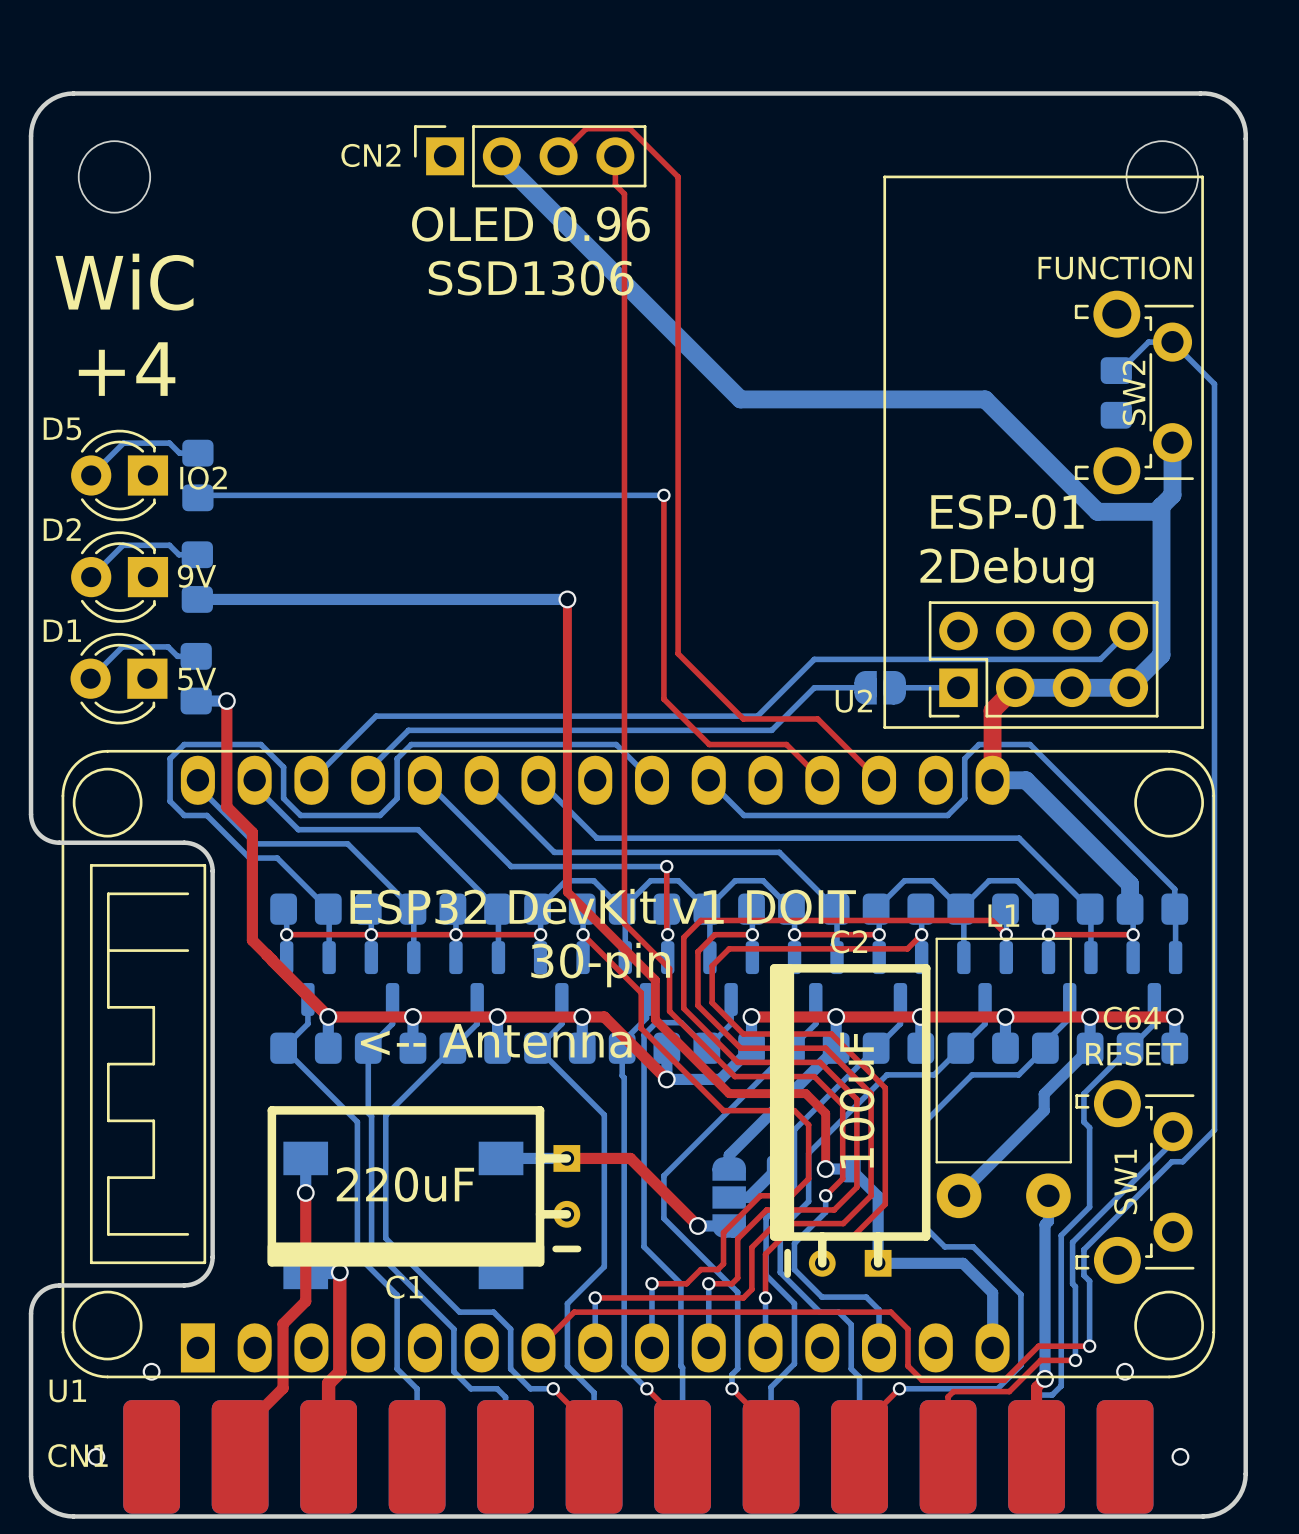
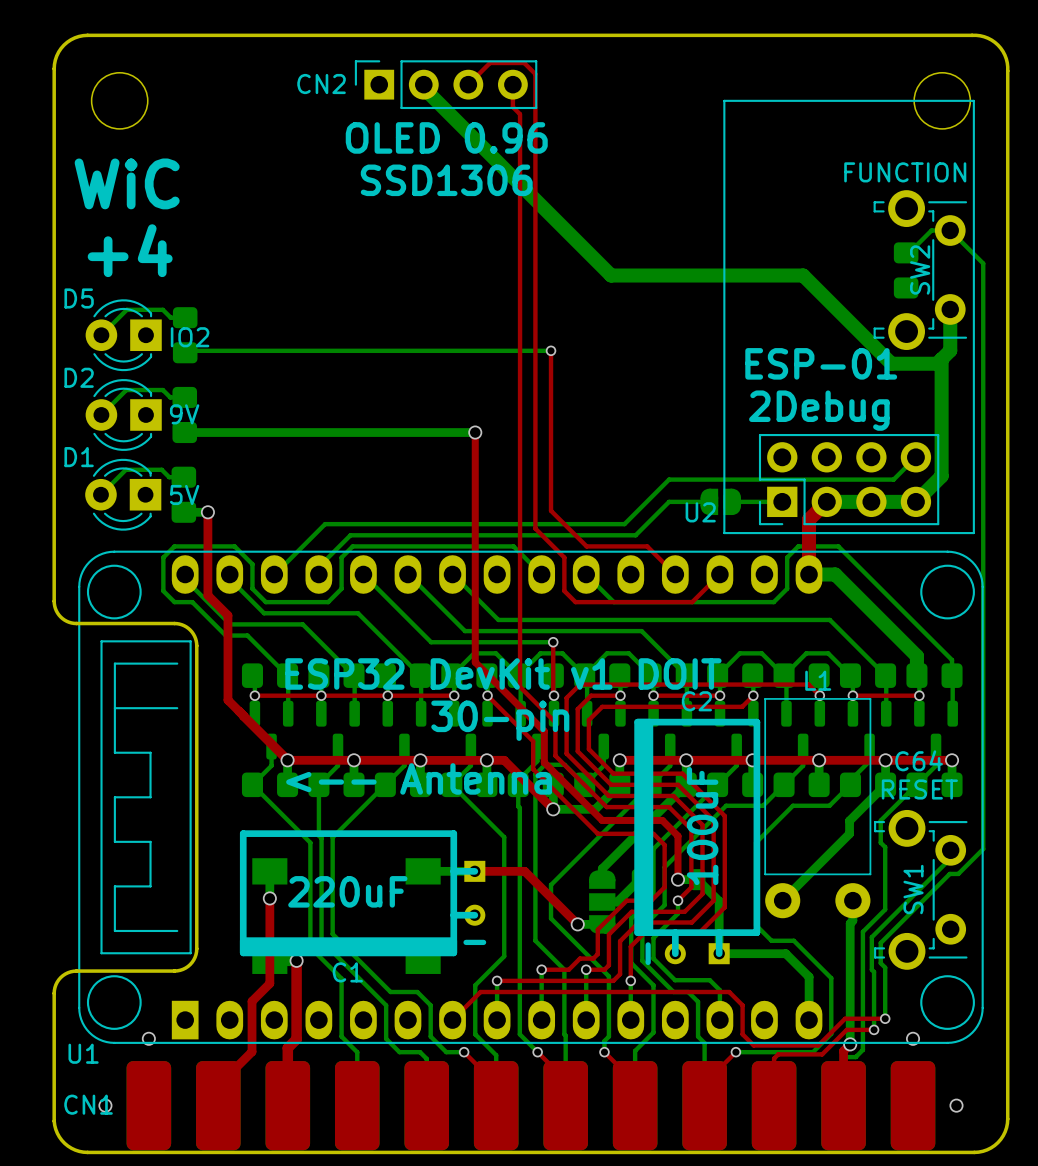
top track: (644, 142) (678, 176) (678, 653) (743, 718) (817, 718) (879, 780) -> (535, 74) (535, 528) (564, 557) (564, 590) (575, 602) (692, 602) (719, 574)

